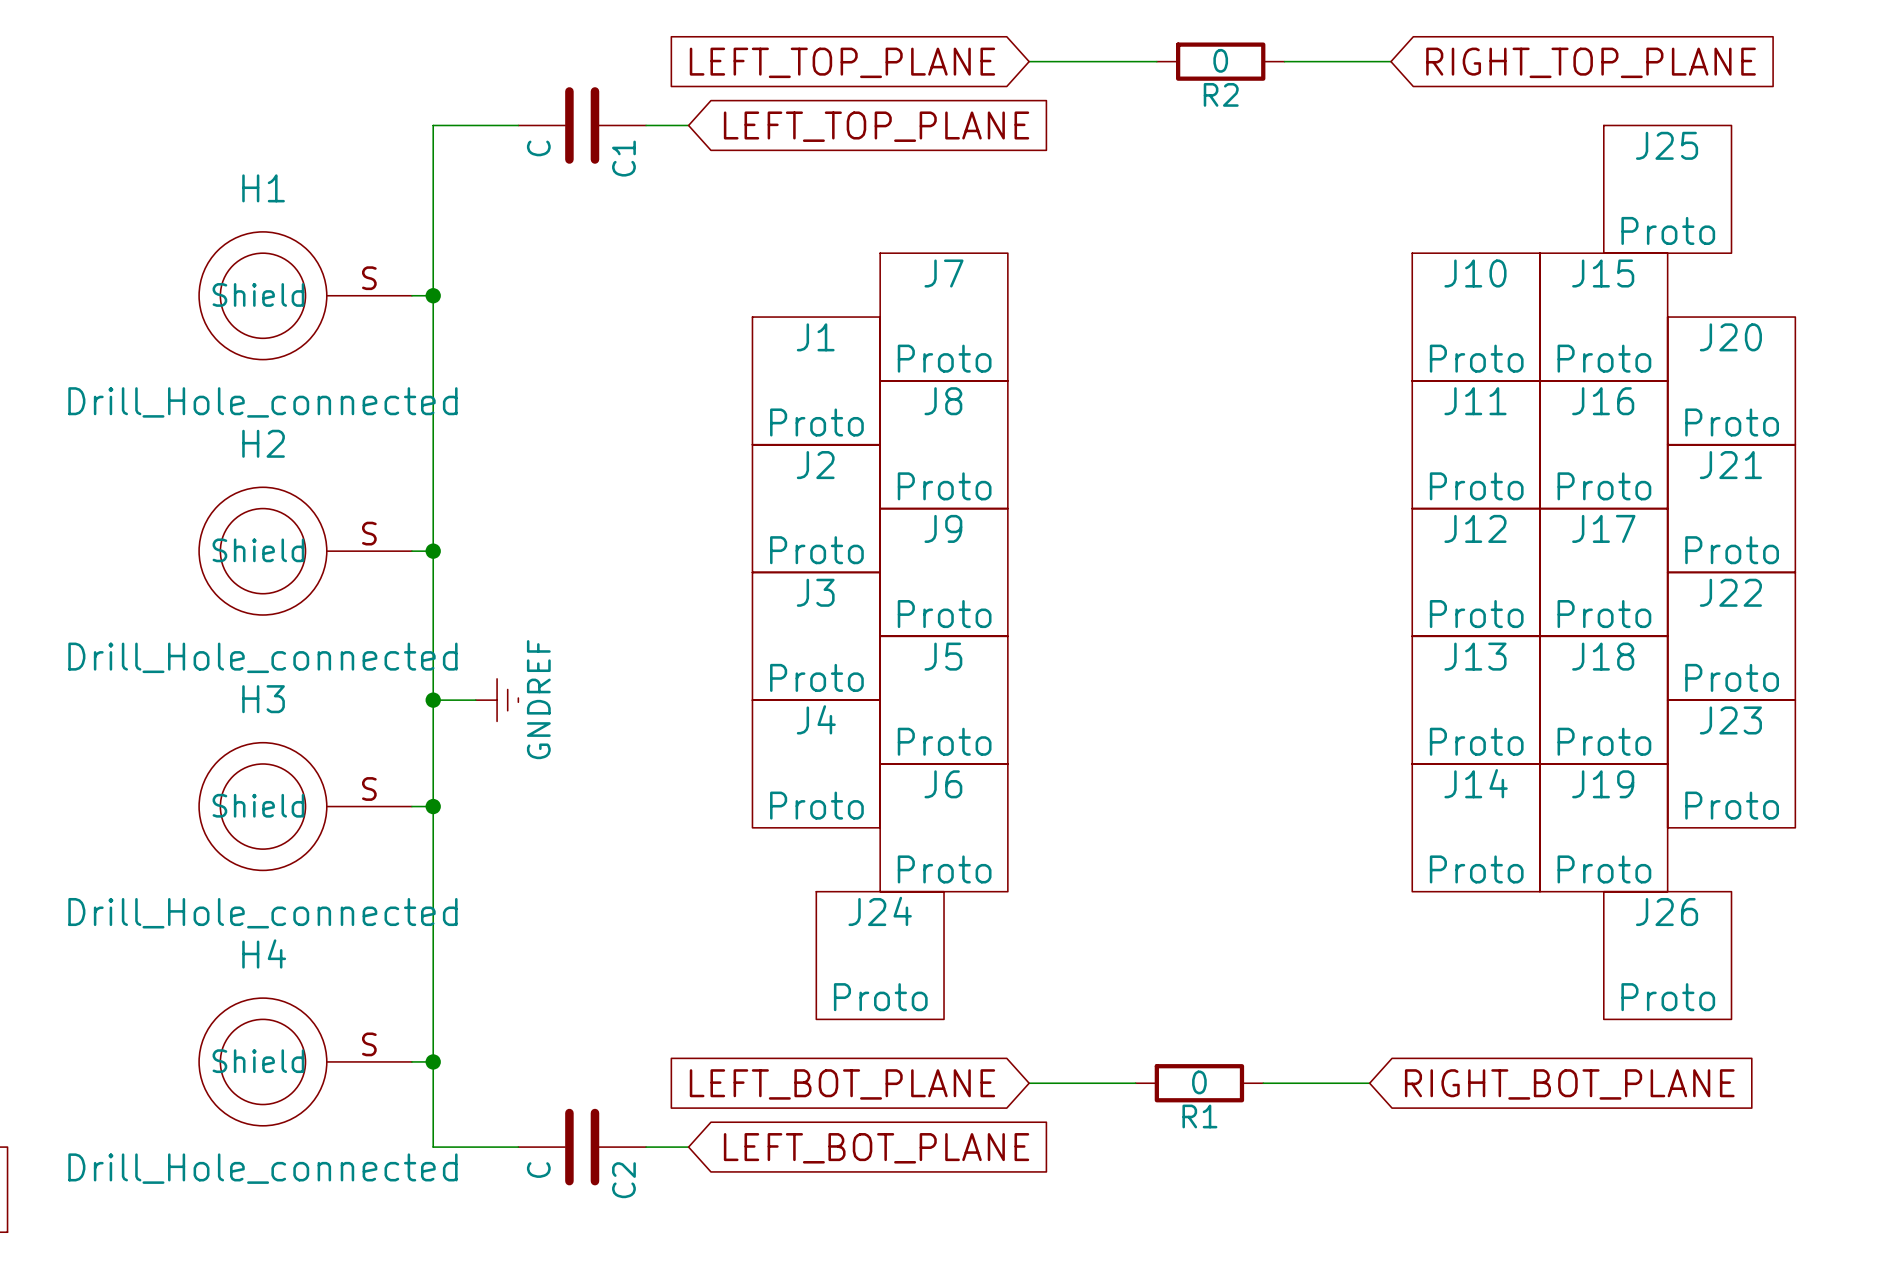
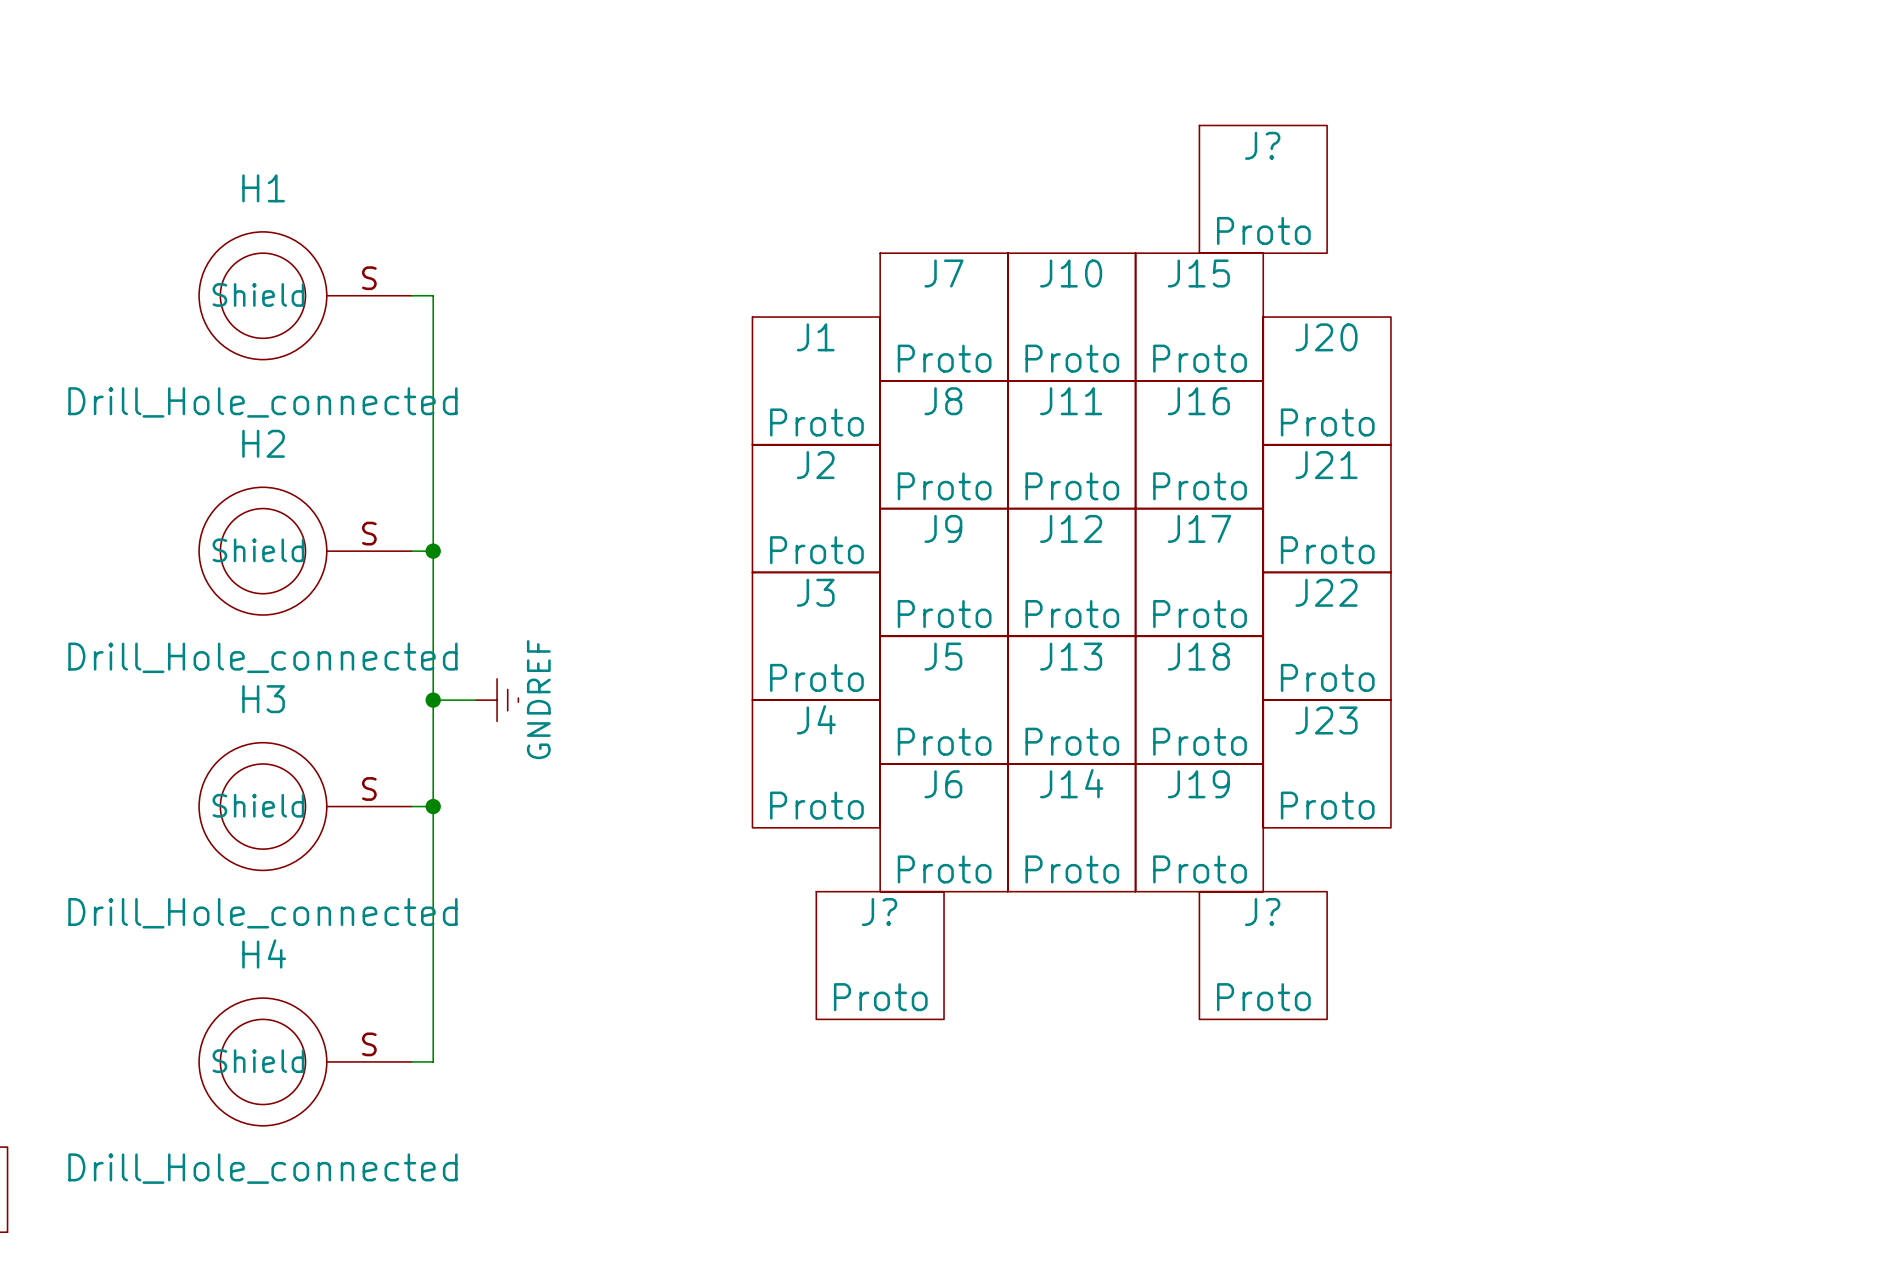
wire: (1029, 61) (1156, 61) -> none
R2: 0 (1220, 61) -> none
wire: (1284, 61) (1390, 61) -> none
global label: LEFT_TOP_PLANE (842, 62) -> none
global label: RIGHT_TOP_PLANE (1591, 62) -> none
wire: (518, 125) (433, 125) (433, 295) -> none
C1: C (582, 125) -> none
wire: (646, 125) (688, 125) -> none
global label: LEFT_TOP_PLANE (876, 126) -> none
J?: none -> Proto (1263, 189)
J25: Proto (1667, 189) -> none
junction: (433, 295) -> none
J10 position: (1476, 317) -> (1071, 317)
J15 position: (1603, 317) -> (1199, 317)
J20 position: (1731, 380) -> (1327, 380)
J11 position: (1476, 444) -> (1071, 444)
J16 position: (1603, 444) -> (1199, 444)
J21 position: (1731, 508) -> (1327, 508)
J12 position: (1476, 572) -> (1071, 572)
J17 position: (1603, 572) -> (1199, 572)
J22 position: (1731, 636) -> (1327, 636)
J13 position: (1476, 700) -> (1071, 700)
J18 position: (1603, 700) -> (1199, 700)
J23 position: (1731, 763) -> (1327, 763)
J14 position: (1476, 827) -> (1071, 827)
J19 position: (1603, 827) -> (1199, 827)
J24 name: J24 (880, 911) -> J? (879, 912)
J?: none -> Proto (1263, 955)
J26: Proto (1667, 955) -> none
wire: (433, 1061) (433, 1147) (518, 1147) -> none
junction: (433, 1061) -> none
wire: (1029, 1083) (1135, 1083) -> none
R1: 0 (1199, 1083) -> none
wire: (1263, 1083) (1369, 1083) -> none
global label: LEFT_BOT_PLANE (842, 1084) -> none
global label: RIGHT_BOT_PLANE (1569, 1084) -> none
C2: C (582, 1147) -> none
wire: (646, 1147) (688, 1147) -> none
global label: LEFT_BOT_PLANE (876, 1148) -> none

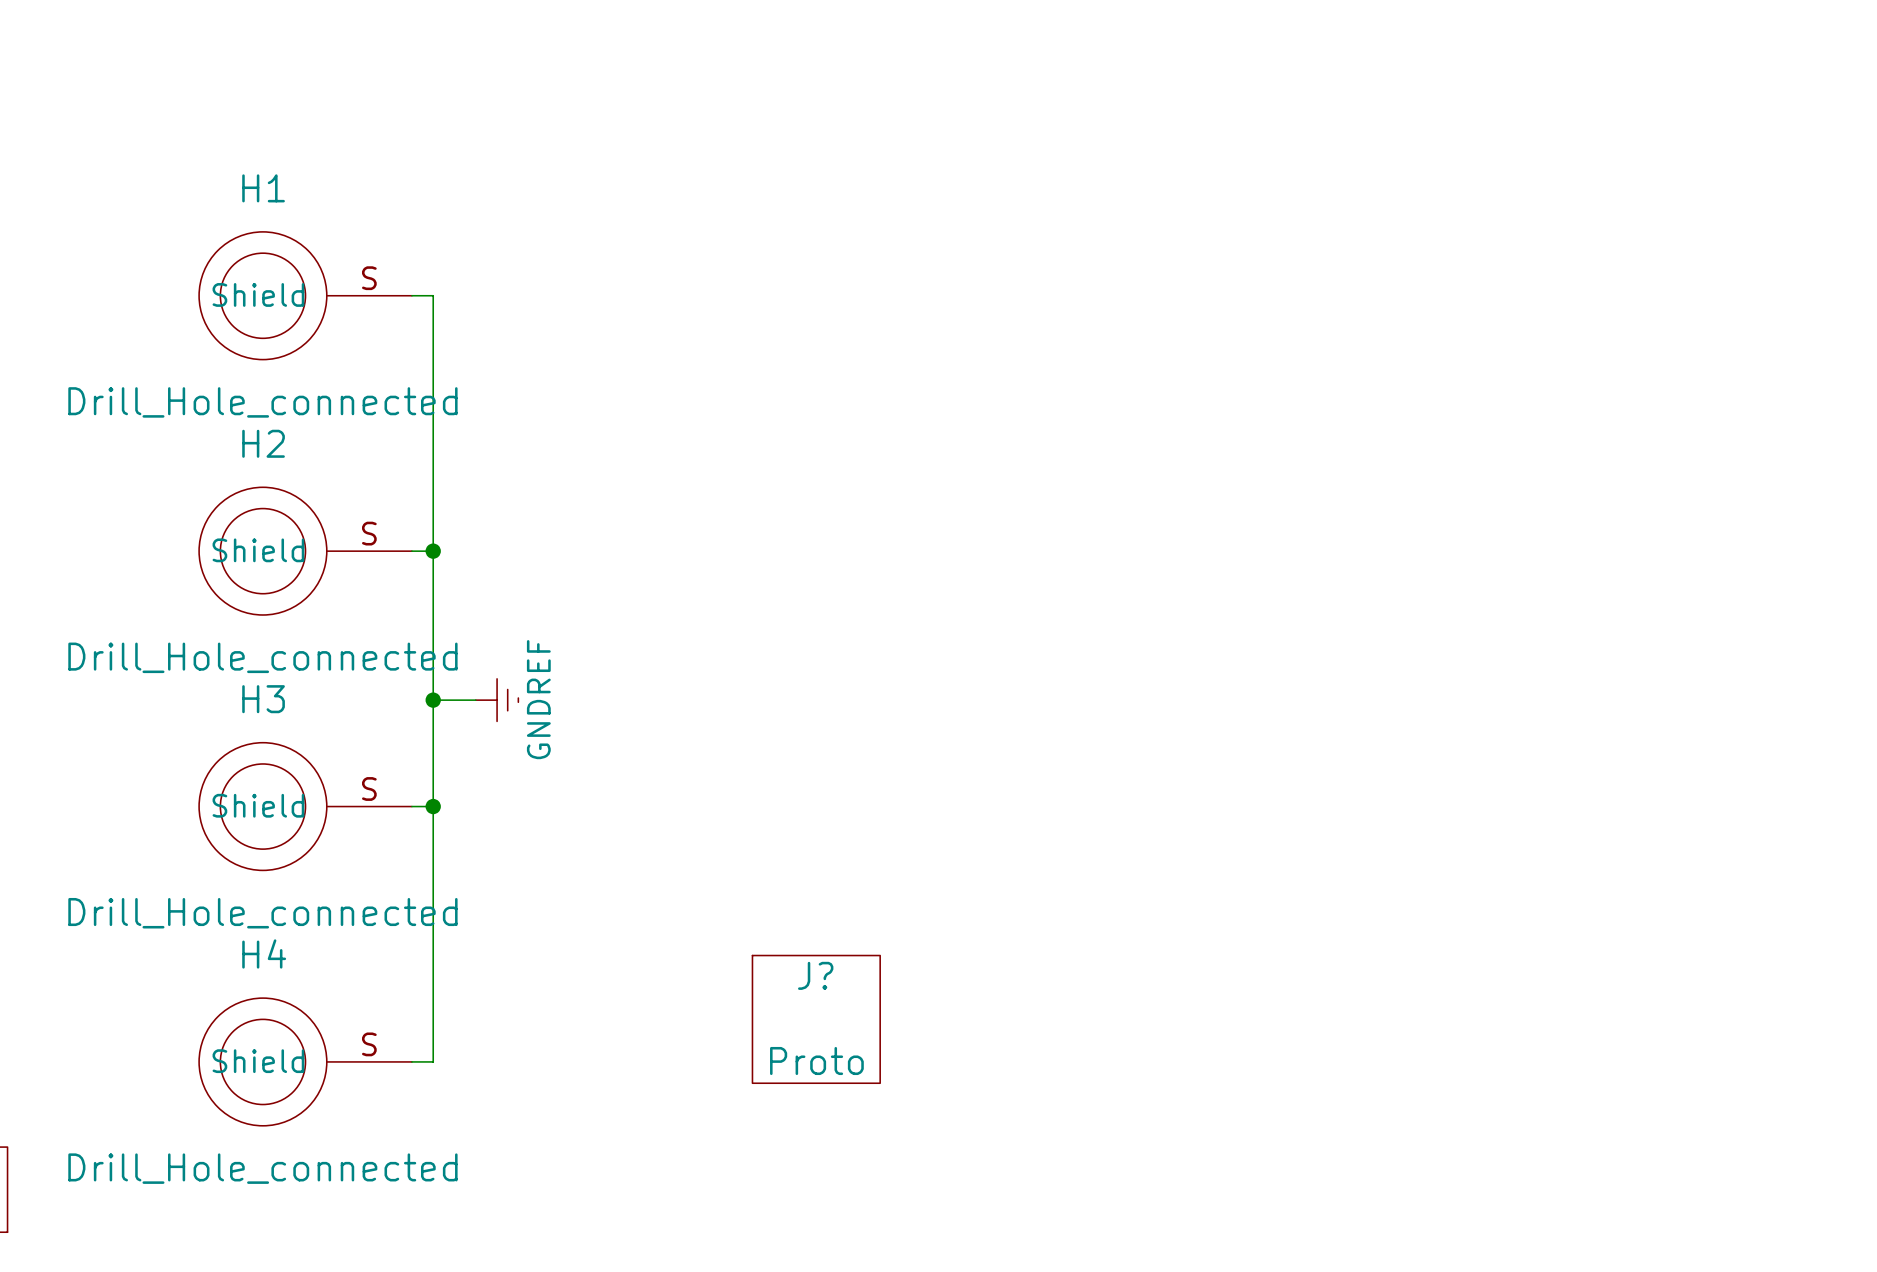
J?: Proto (1263, 189) -> none
J7: Proto (944, 317) -> none
J10: Proto (1071, 317) -> none
J15: Proto (1199, 317) -> none
J1: Proto (816, 380) -> none
J20: Proto (1327, 380) -> none
J8: Proto (944, 444) -> none
J11: Proto (1071, 444) -> none
J16: Proto (1199, 444) -> none
J2: Proto (816, 508) -> none
J21: Proto (1327, 508) -> none
J9: Proto (944, 572) -> none
J12: Proto (1071, 572) -> none
J17: Proto (1199, 572) -> none
J3: Proto (816, 636) -> none
J22: Proto (1327, 636) -> none
J5: Proto (944, 700) -> none
J13: Proto (1071, 700) -> none
J18: Proto (1199, 700) -> none
J4: Proto (816, 763) -> none
J23: Proto (1327, 763) -> none
J6: Proto (944, 827) -> none
J14: Proto (1071, 827) -> none
J19: Proto (1199, 827) -> none
J? position: (880, 955) -> (816, 1019)
J?: Proto (1263, 955) -> none

